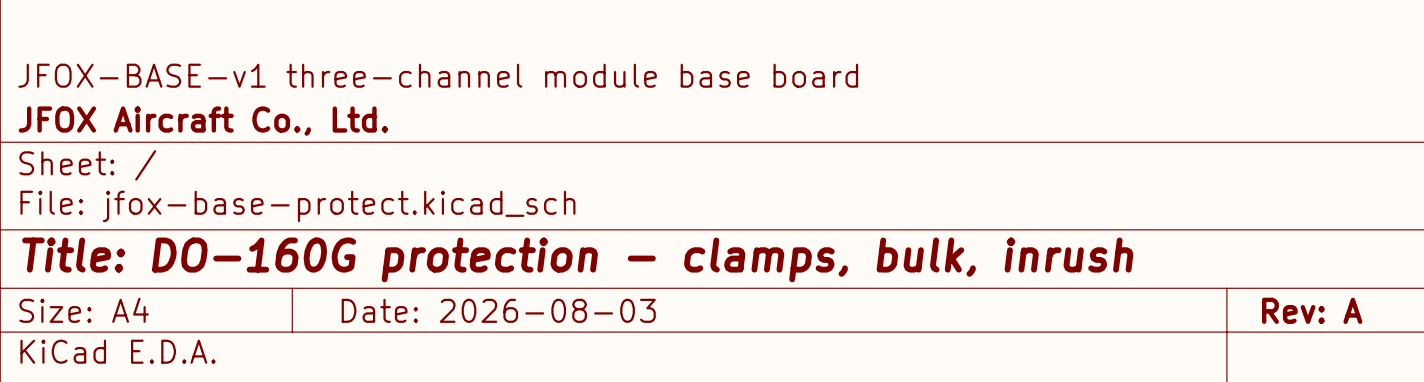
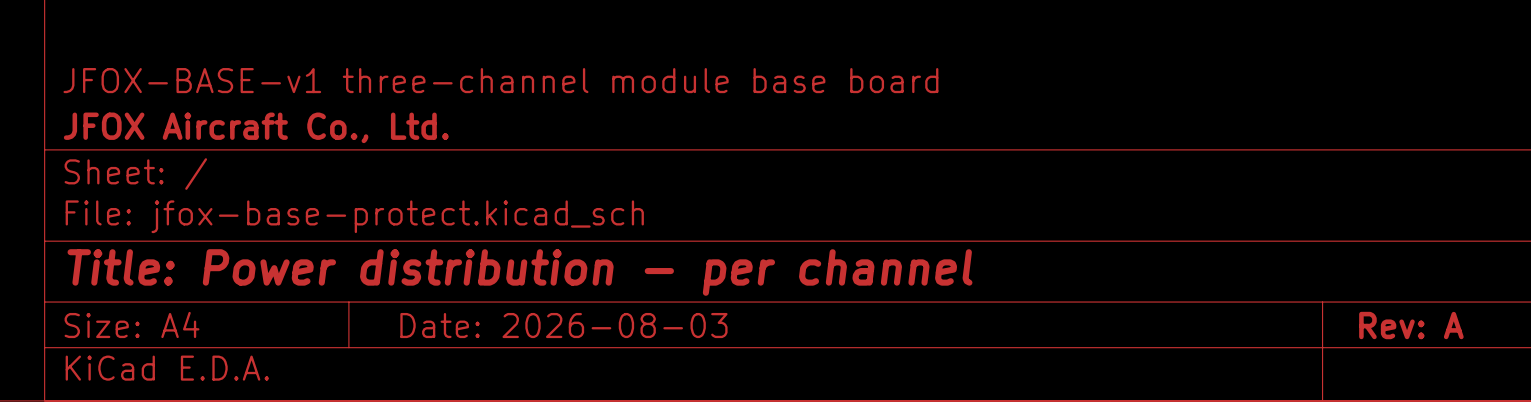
title block: Title: DO-160G protection - clamps, bulk, inrush (577, 259) -> Title: Power distribution - per channel (519, 272)

